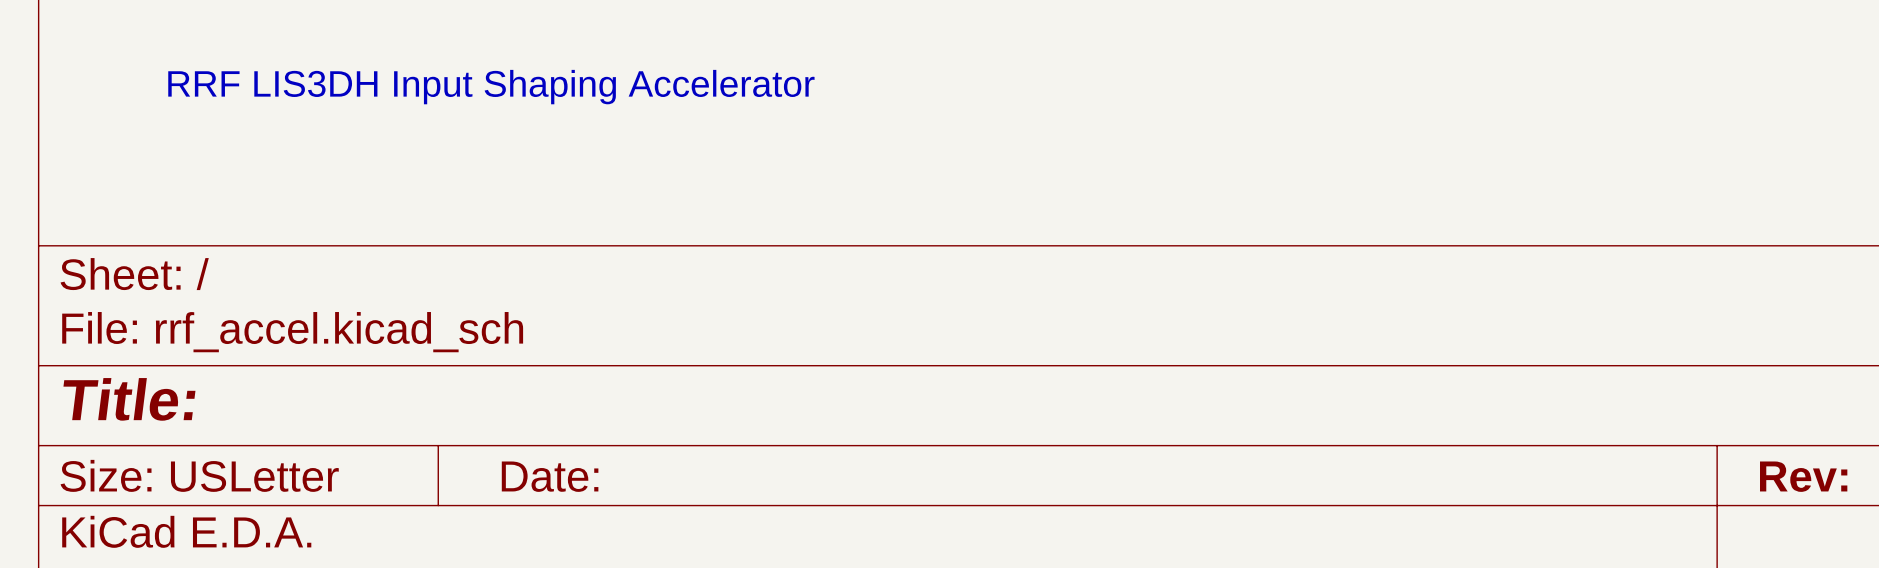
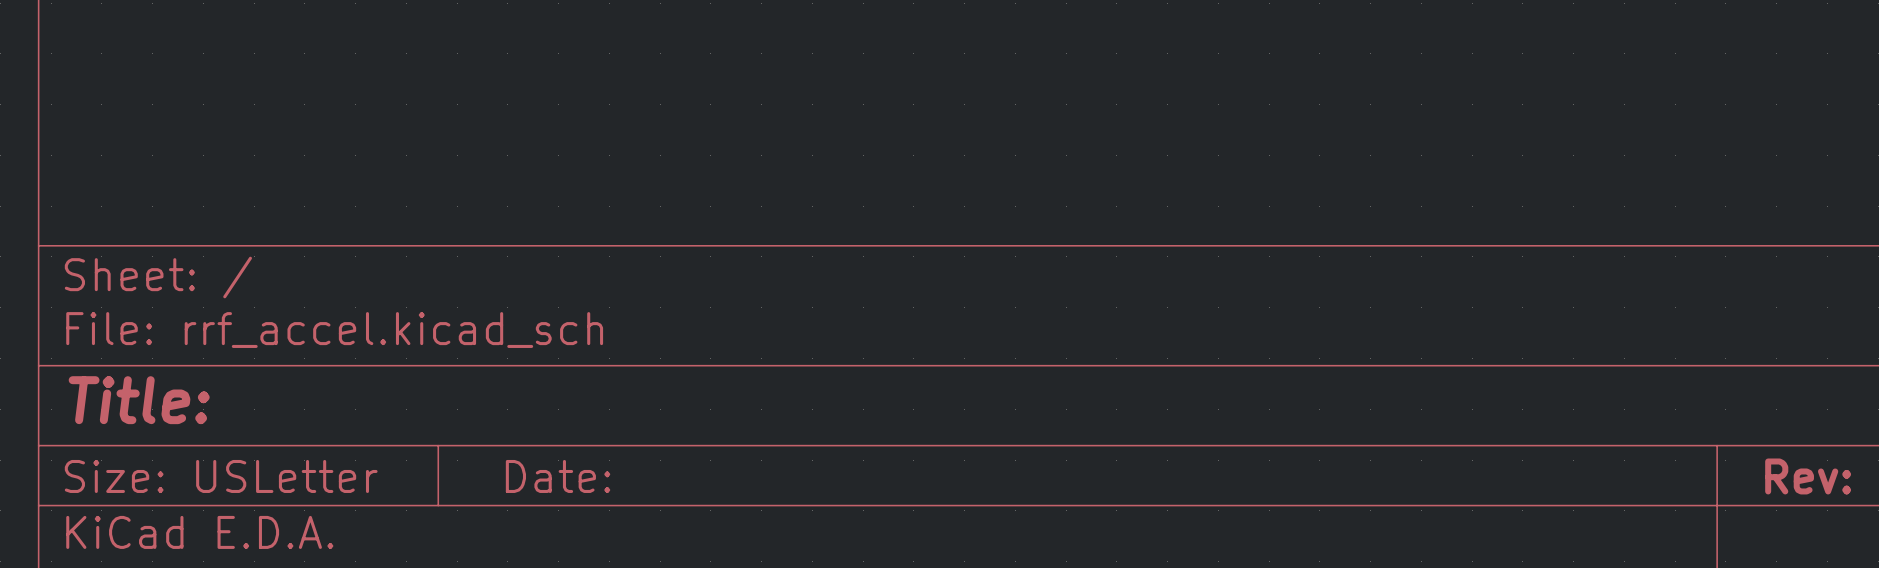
text: RRF LIS3DH Input Shaping Accelerator (491, 87) -> none

